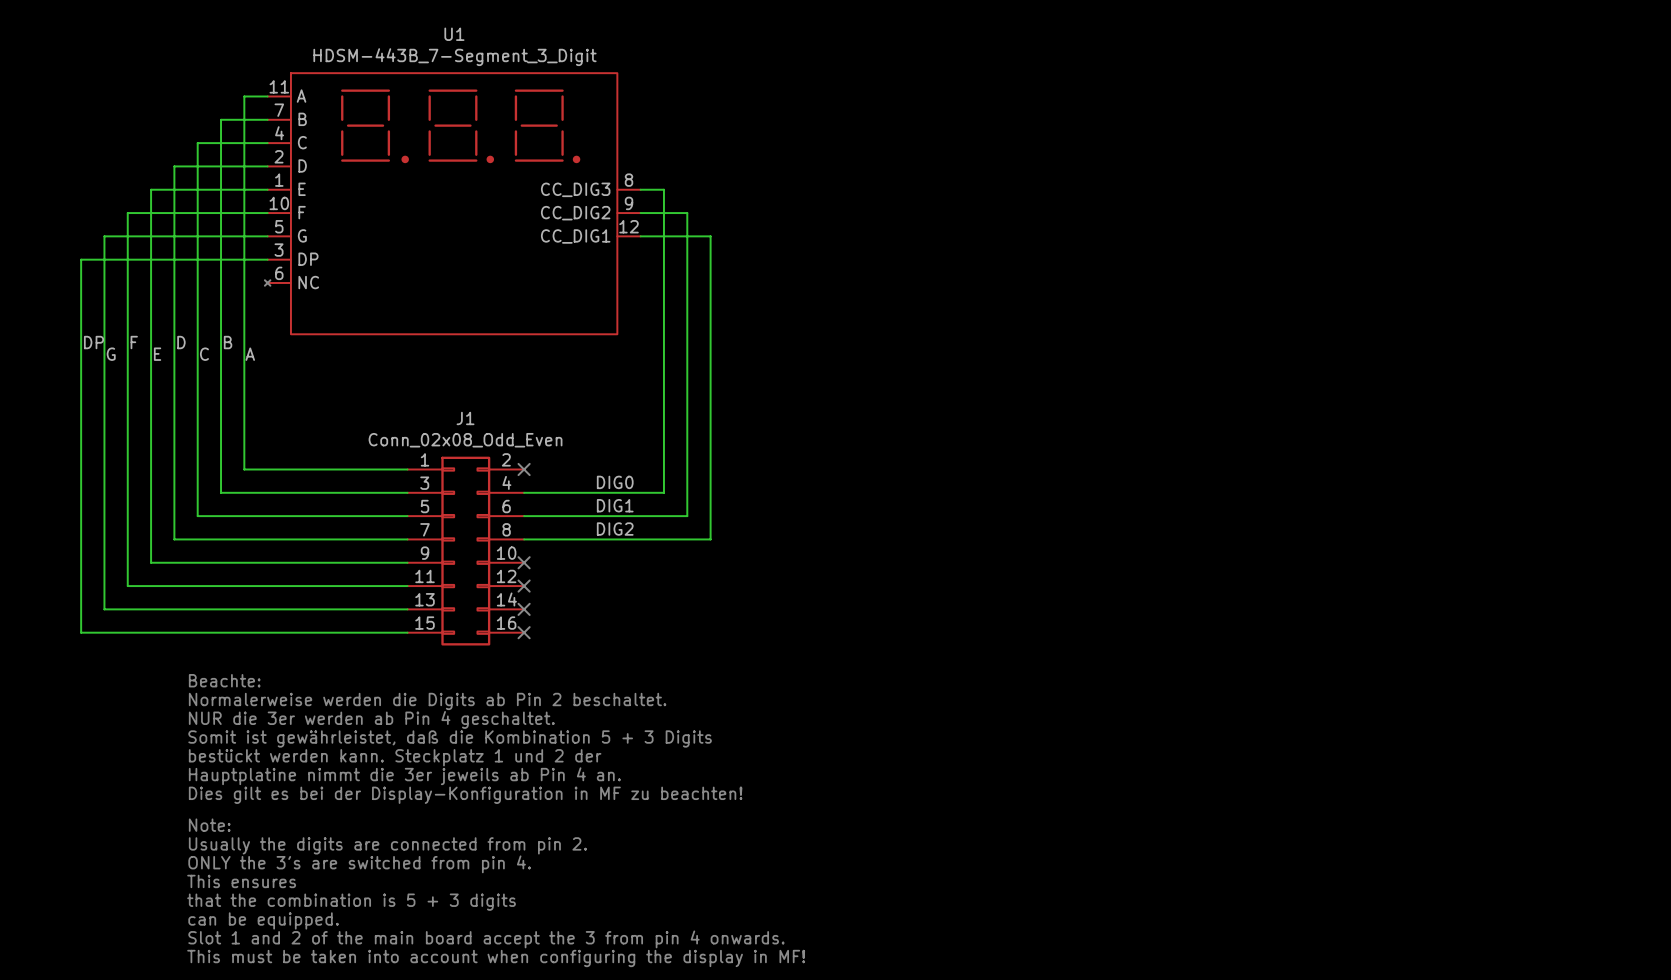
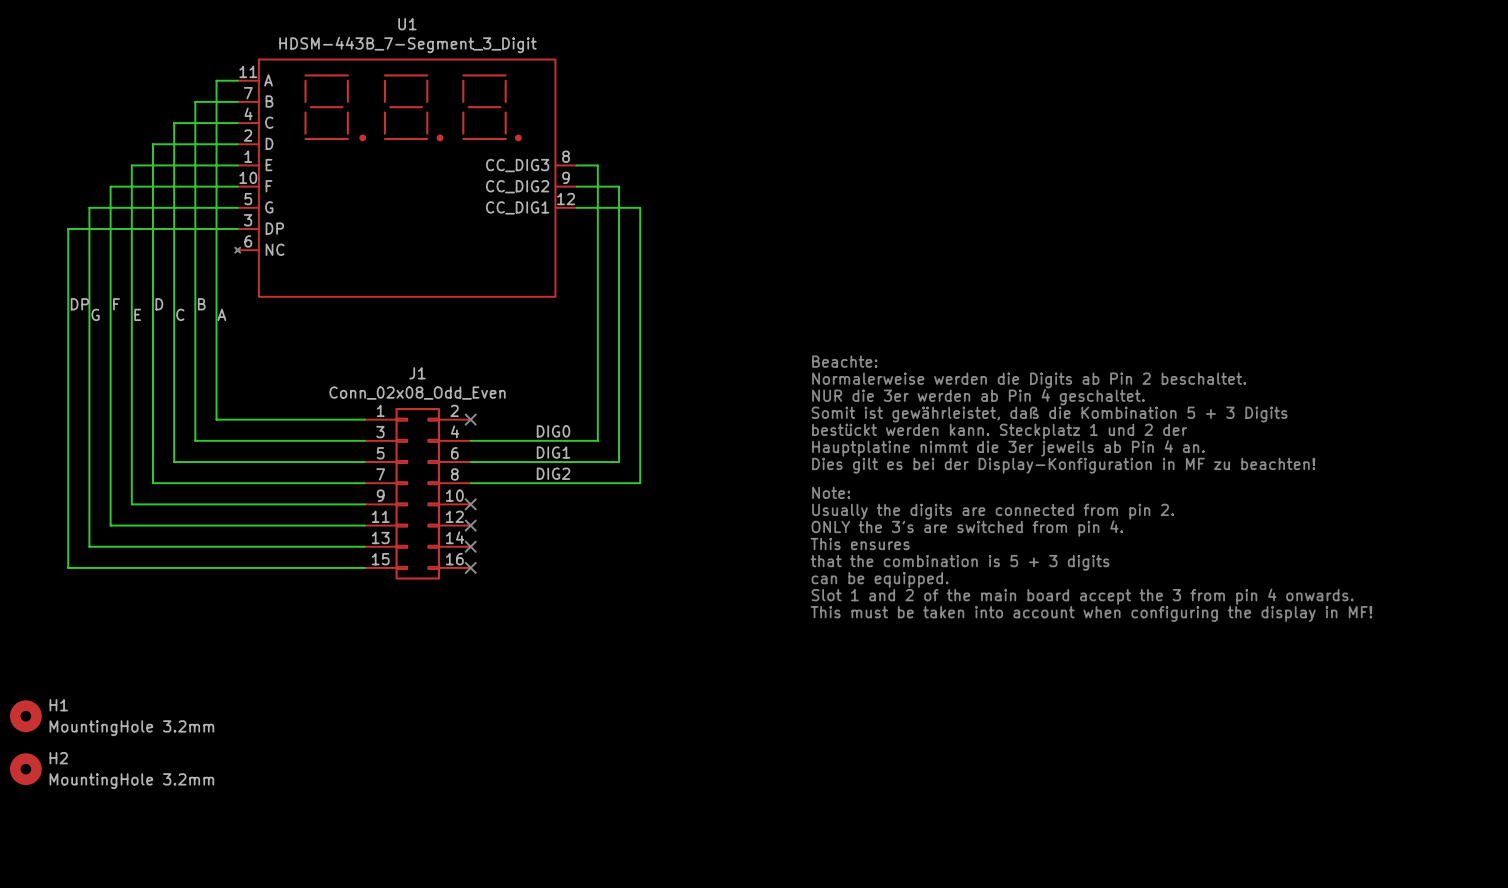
text: none -> Beachte: (844, 361)
text: none -> Normalerweise werden die Digits ab Pin 2 beschaltet. (1029, 380)
text: none -> NUR die 3er werden ab Pin 4 geschaltet. (978, 397)
text: none -> Somit ist gewährleistet, daß die Kombination 5 + 3 Digits (1049, 414)
text: none -> bestückt werden kann. Steckplatz 1 und 2 der (999, 431)
text: none -> Hauptplatine nimmt die 3er jeweils ab Pin 4 an. (1008, 448)
text: none -> Dies gilt es bei der Display-Konfiguration in MF zu beachten! (1063, 465)
text: none -> Note: (831, 492)
text: none -> Usually the digits are connected from pin 2. (993, 511)
text: none -> ONLY the 3's are switched from pin 4. (967, 528)
text: none -> This ensures (860, 544)
text: none -> that the combination is 5 + 3 digits (960, 562)
text: none -> can be equipped. (880, 579)
text: none -> Slot 1 and 2 of the main board accept the 3 from pin 4 onwards. (1082, 596)
text: Beachte: (224, 680) -> none
text: none -> This must be taken into account when configuring the display in MF! (1091, 613)
text: Normalerweise werden die Digits ab Pin 2 beschaltet. (427, 701) -> none
text: NUR die 3er werden ab Pin 4 geschaltet. (371, 719) -> none
text: Somit ist gewährleistet, daß die Kombination 5 + 3 Digits (450, 738) -> none
text: bestückt werden kann. Steckplatz 1 und 2 der (395, 757) -> none
text: Hauptplatine nimmt die 3er jeweils ab Pin 4 an. (404, 776) -> none
H1: none -> MountingHole 3.2mm (25, 716)
text: Dies gilt es bei der Display-Konfiguration in MF zu beachten! (465, 795) -> none
text: Note: (209, 825) -> none
text: Usually the digits are connected from pin 2. (387, 845) -> none
H2: none -> MountingHole 3.2mm (25, 769)
text: ONLY the 3's are switched from pin 4. (359, 864) -> none
text: This ensures (241, 881) -> none
text: that the combination is 5 + 3 digits (351, 902) -> none
text: can be equipped. (263, 920) -> none
text: Slot 1 and 2 of the main board accept the 3 from pin 4 onwards. (486, 939) -> none
text: This must be taken into account when configuring the display in MF! (496, 958) -> none

